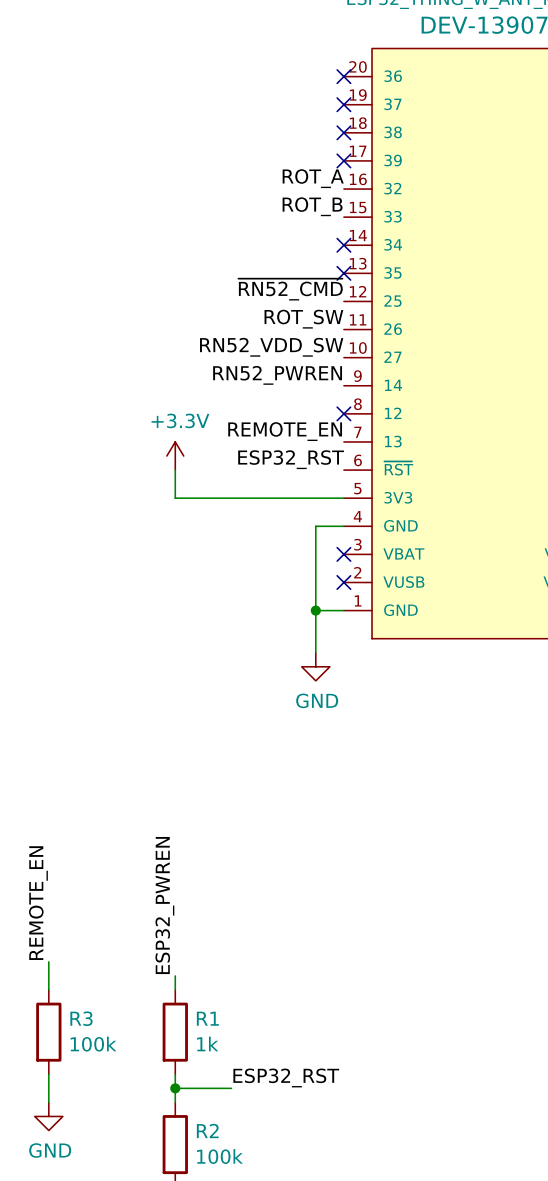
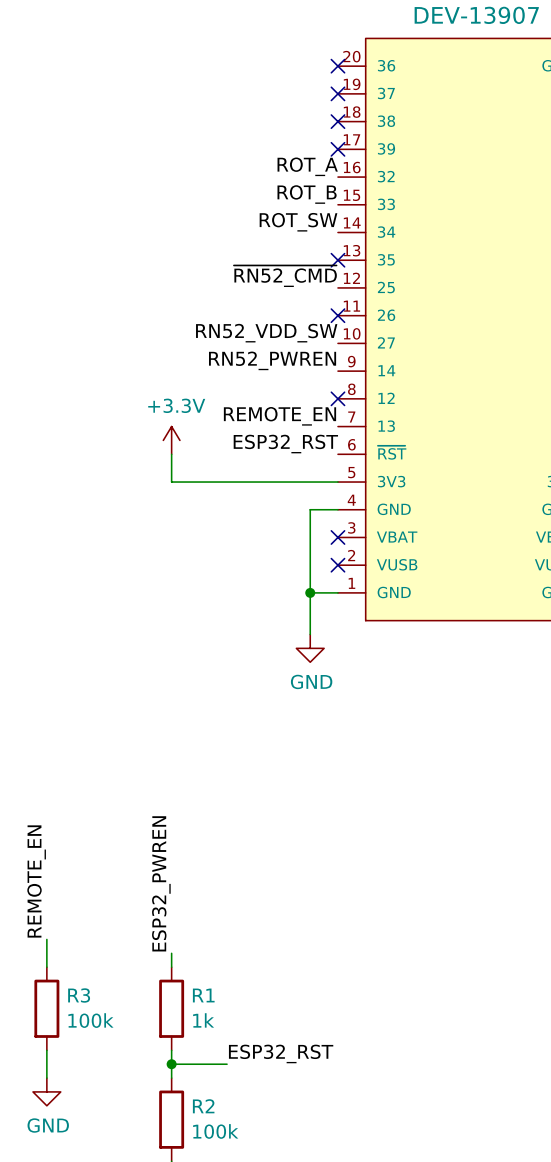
no-connect mark: (343, 245) -> none
label position: ROT_SW (303, 319) -> ROT_SW (298, 222)
no-connect mark: none -> (337, 315)

